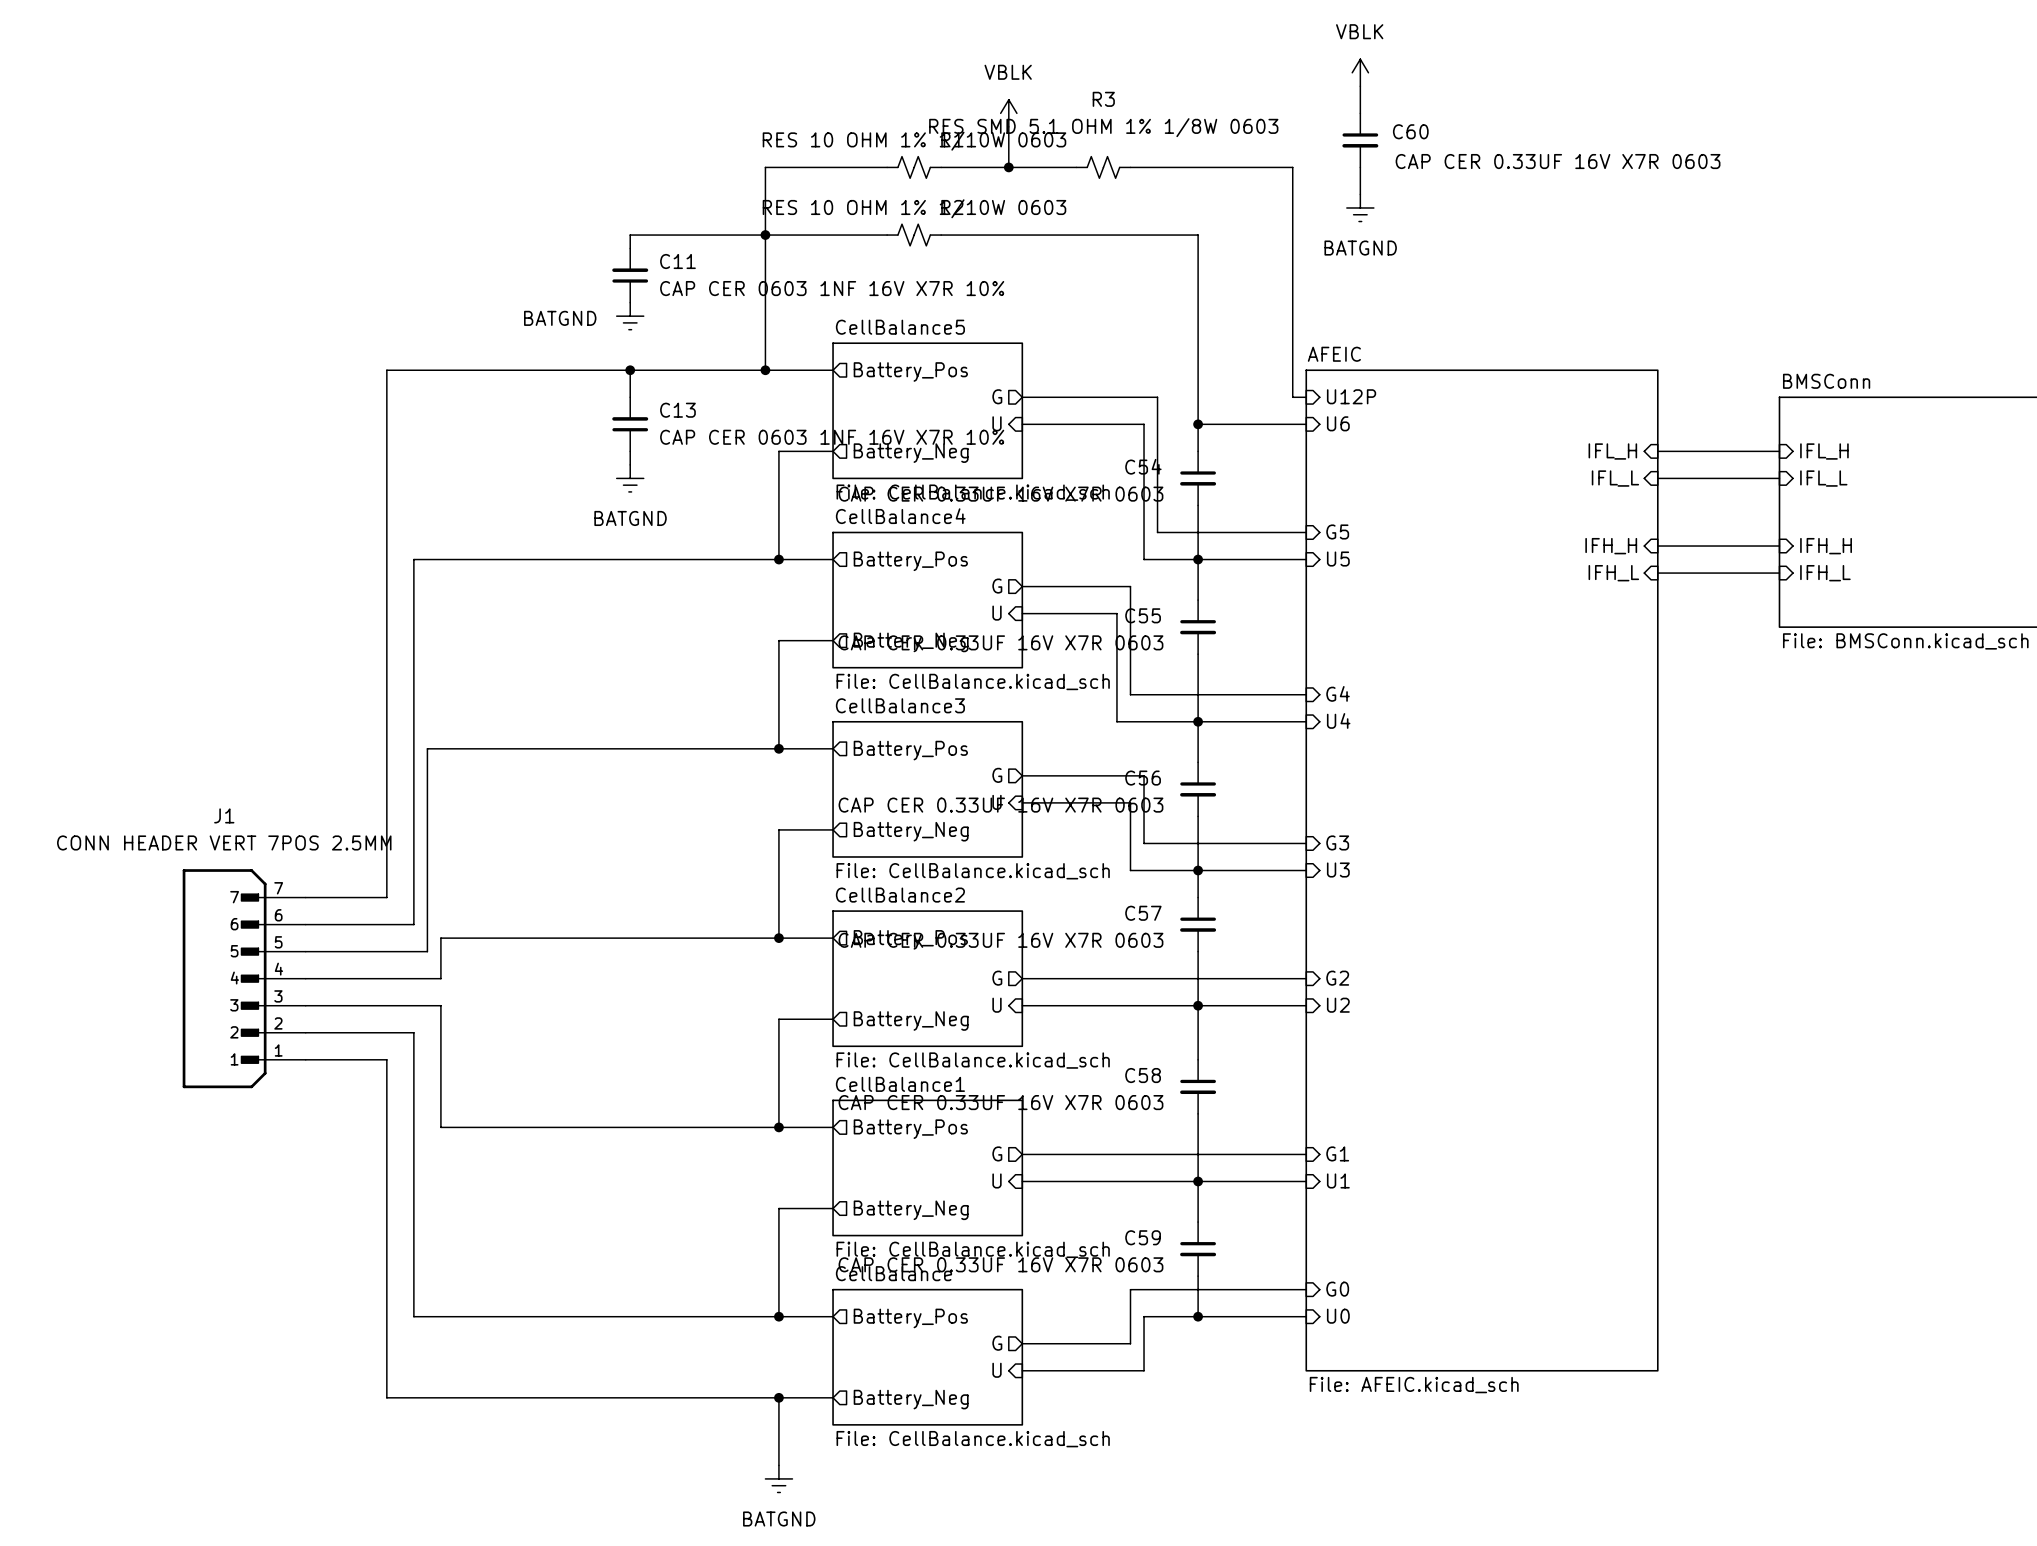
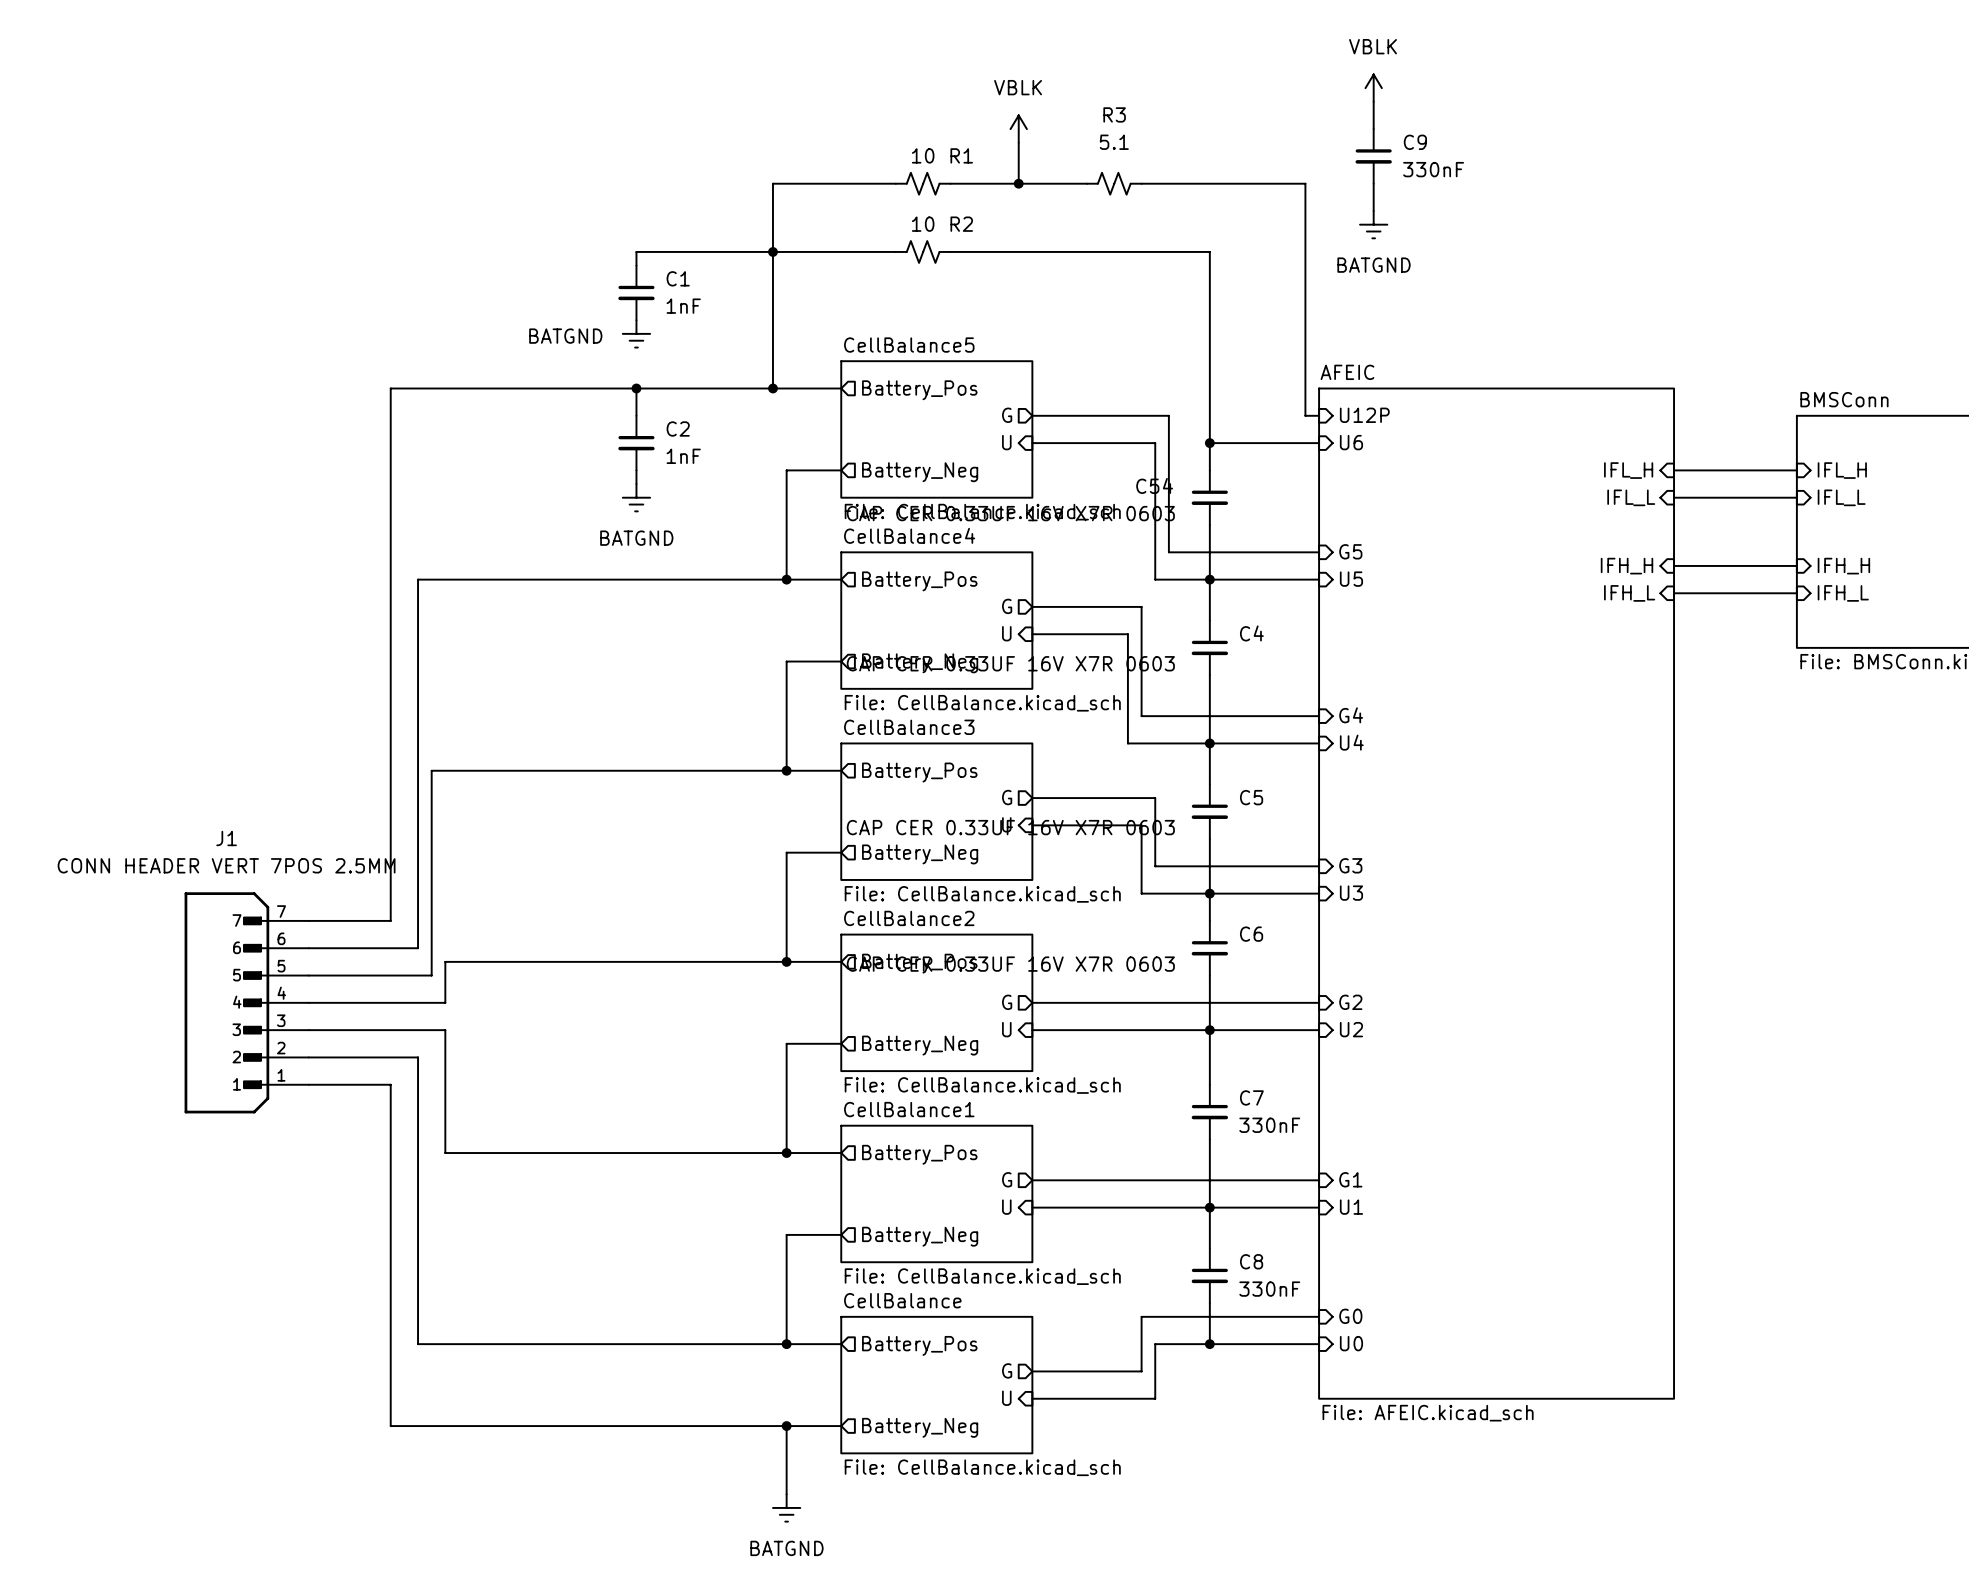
R3 value: RES SMD 5.1 OHM 1% 1/8W 0603 (1103, 127) -> 5.1 (1114, 142)
C60 name: C60 (1410, 131) -> C9 (1415, 142)
R1 value: RES 10 OHM 1% 1/10W 0603 (914, 141) -> 10 (923, 155)
C60 value: CAP CER 0.33UF 16V X7R 0603 (1558, 161) -> 330nF (1433, 169)
R2 value: RES 10 OHM 1% 1/10W 0603 (914, 208) -> 10 (923, 224)
C11: CAP CER 0603 1NF 16V X7R 10% (630, 275) -> none
C1: none -> 1nF (636, 292)
C13: CAP CER 0603 1NF 16V X7R 10% (630, 424) -> none
C2: none -> 1nF (636, 443)
C55 name: C55 (1143, 615) -> C4 (1251, 633)
C56 name: C56 (1143, 778) -> C5 (1251, 797)
C57 name: C57 (1143, 913) -> C6 (1251, 934)
C58 name: C58 (1143, 1075) -> C7 (1251, 1097)
C58 value: CAP CER 0.33UF 16V X7R 0603 (1000, 1102) -> 330nF (1269, 1125)
C59 name: C59 (1143, 1237) -> C8 (1251, 1261)
C59 value: CAP CER 0.33UF 16V X7R 0603 (1000, 1264) -> 330nF (1269, 1289)

